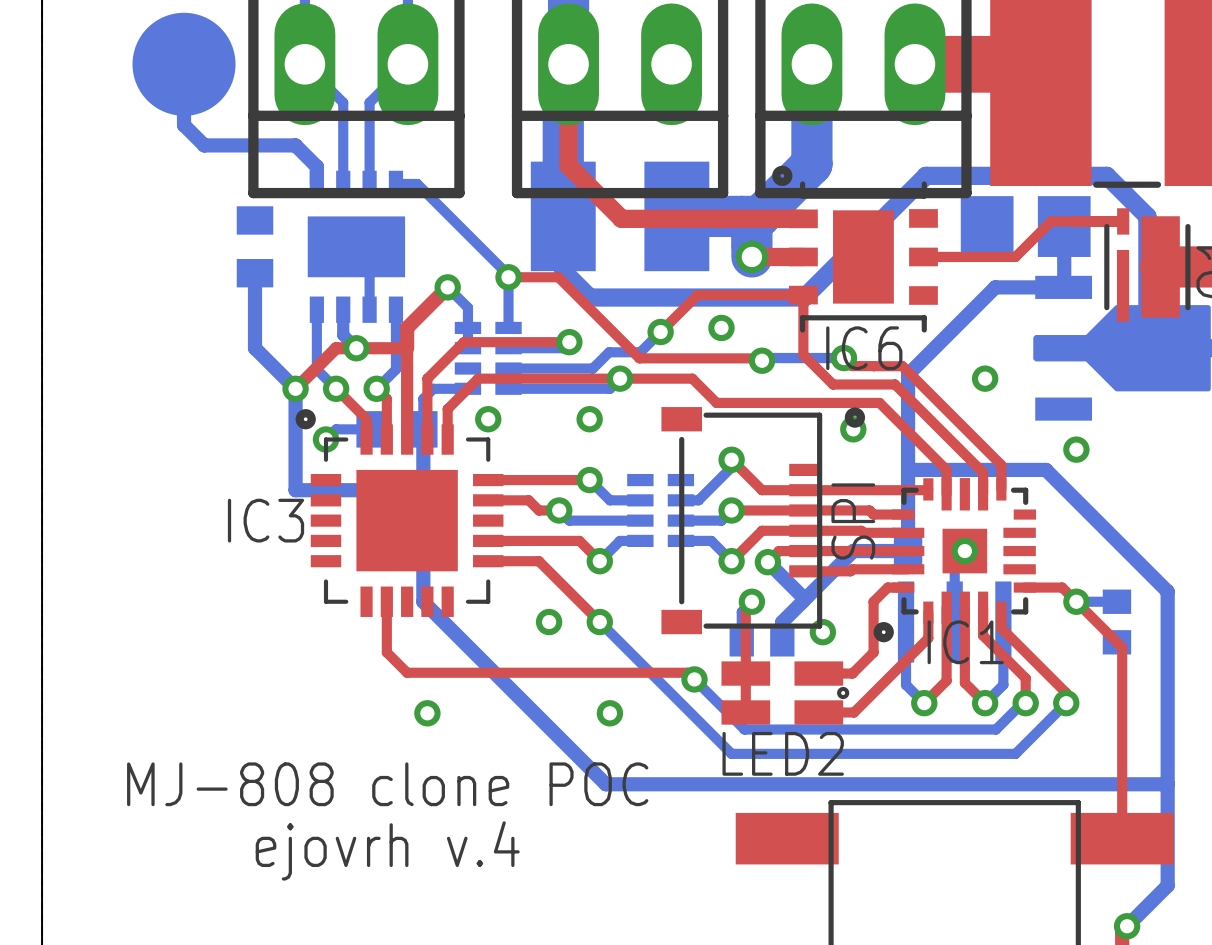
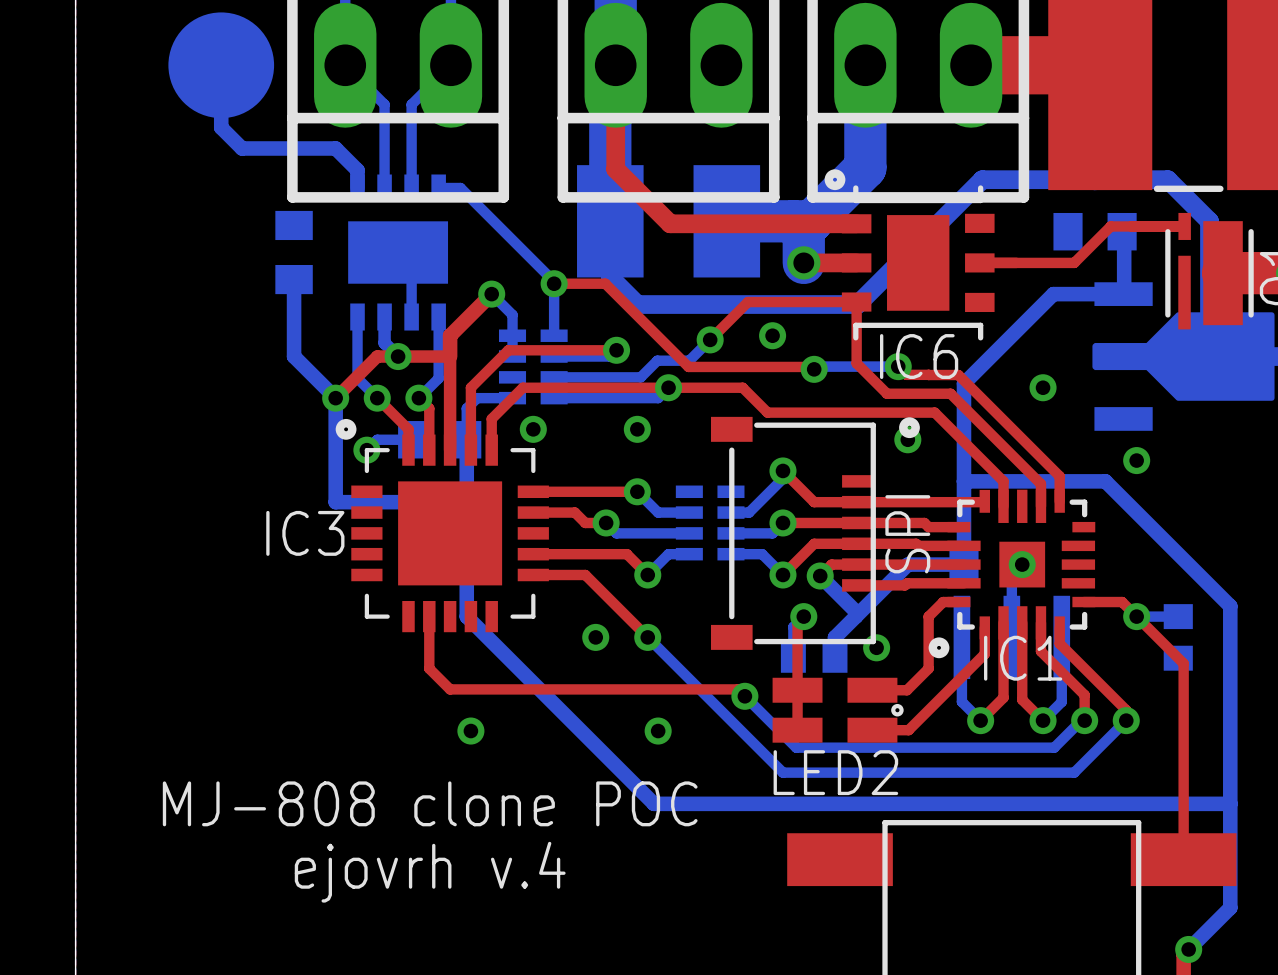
part footprint: [960, 196, 1091, 257] -> [1053, 212, 1137, 251]

